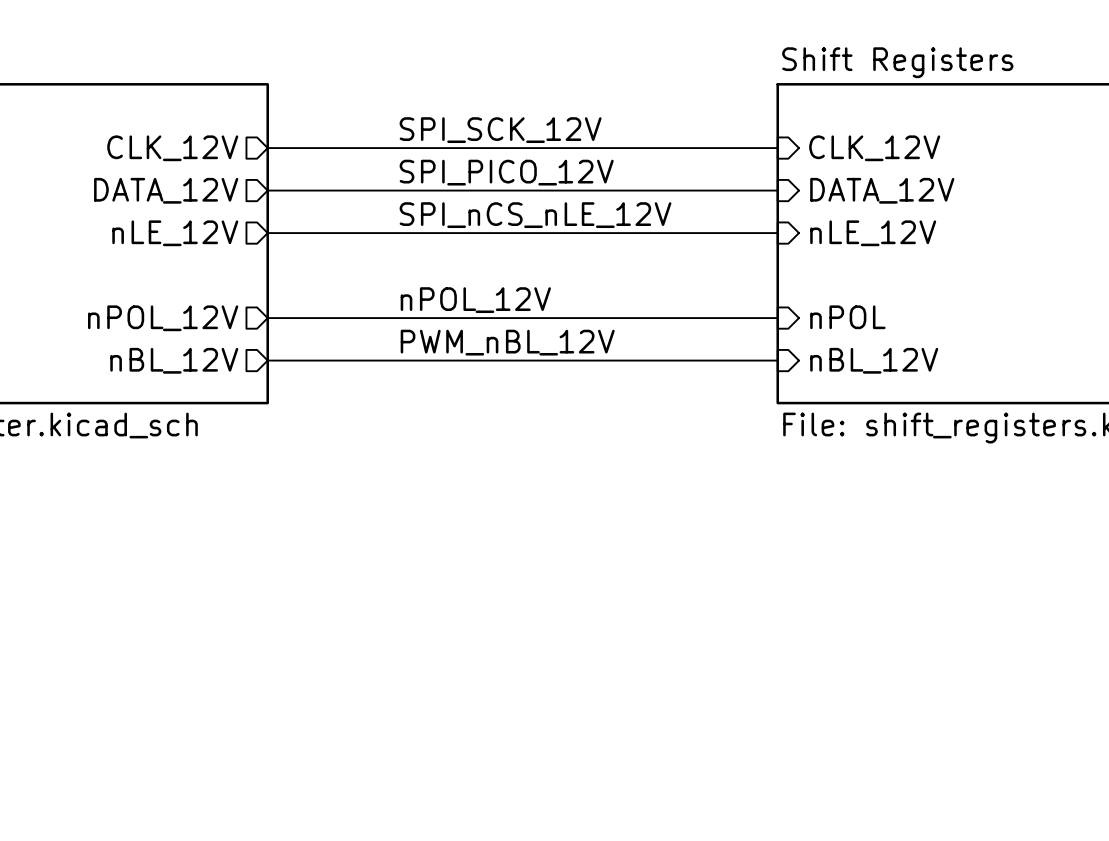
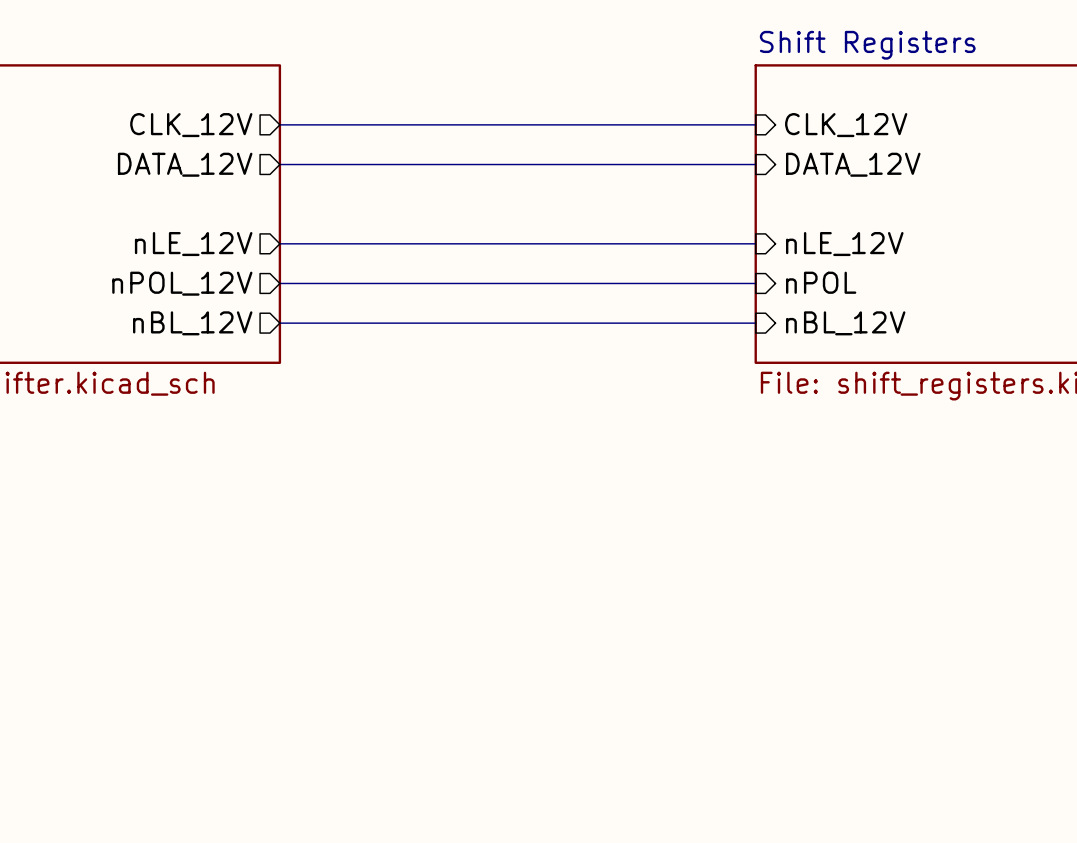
label: SPI_SCK_12V (500, 130) -> none
label: SPI_PICO_12V (506, 172) -> none
label: SPI_nCS_nLE_12V (535, 215) -> none
sheet pin position: nLE_12V (175, 233) -> nLE_12V (193, 244)
wire: (267, 233) (777, 233) -> (279, 243) (755, 243)
sheet pin position: nLE_12V (873, 233) -> nLE_12V (844, 244)
label: nPOL_12V (475, 300) -> none
label: PWM_nBL_12V (507, 342) -> none

